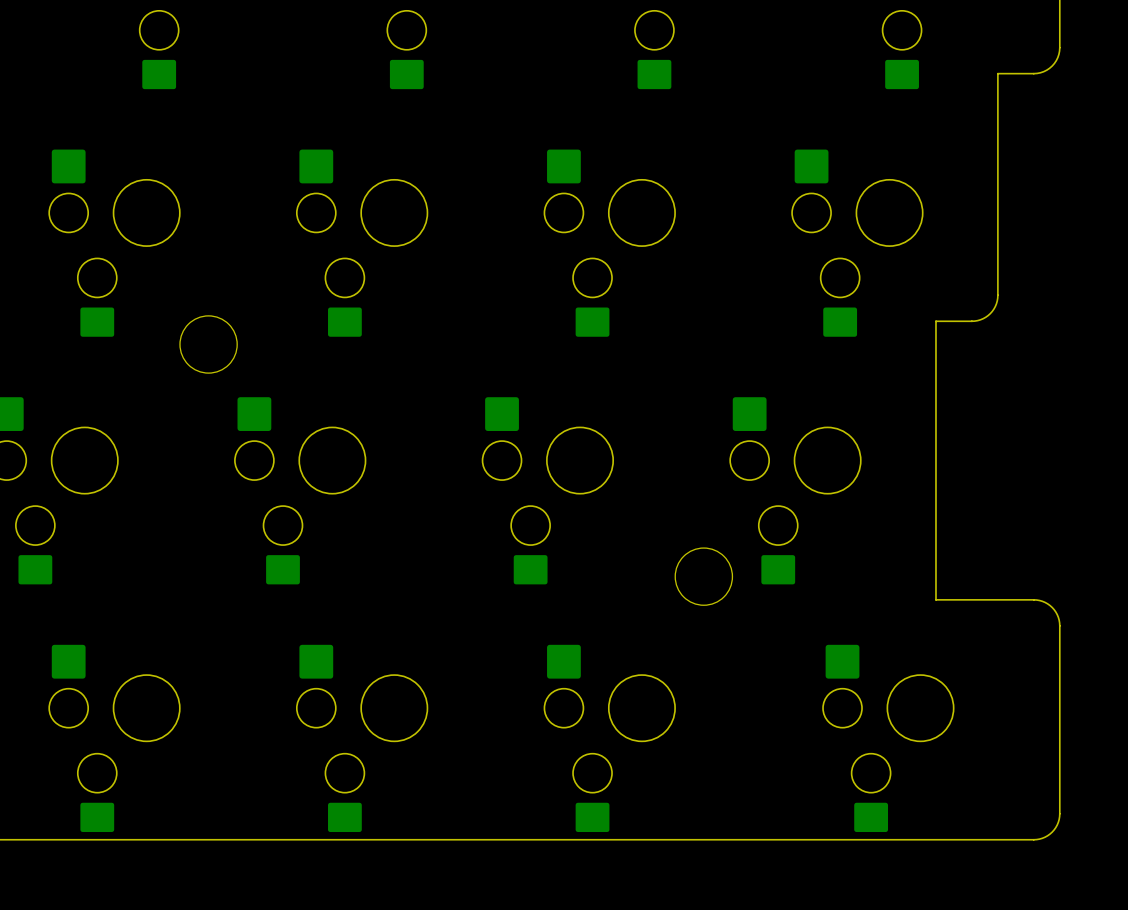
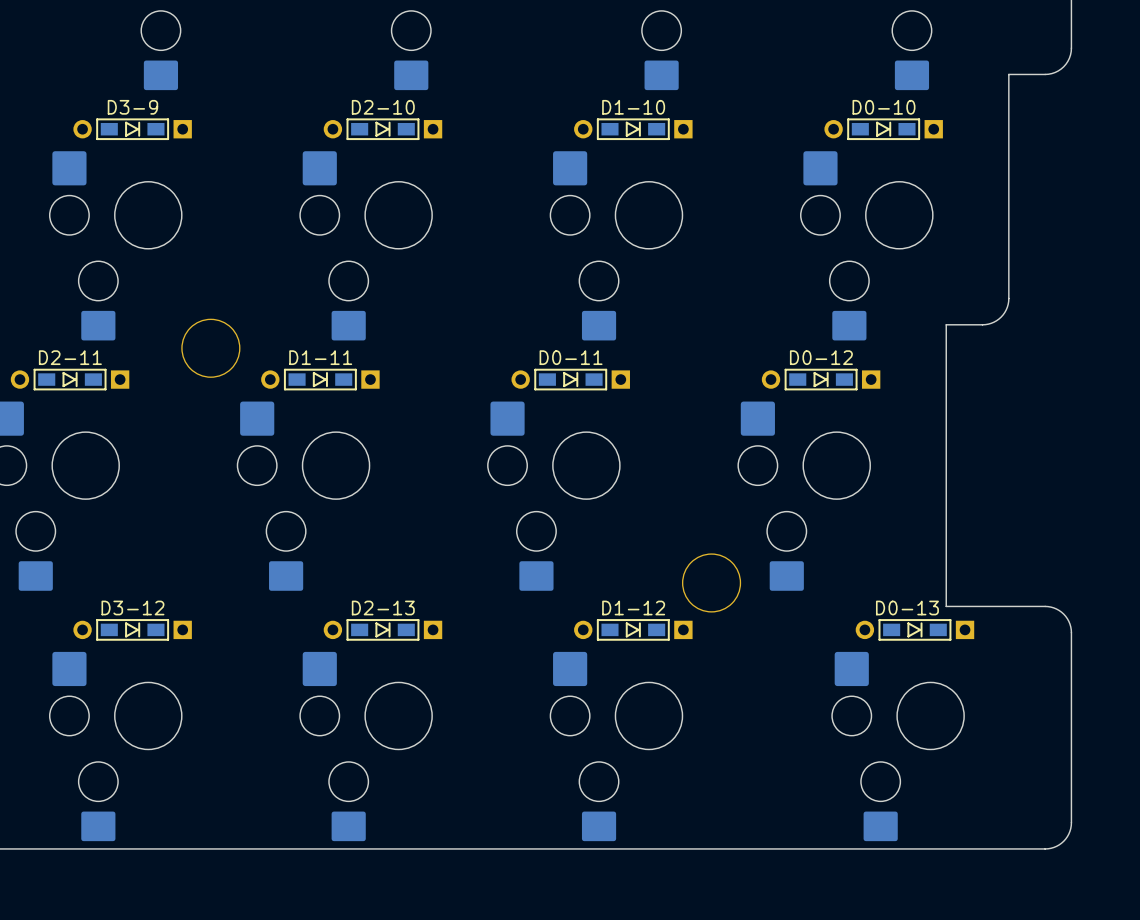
D3-9: none -> (132, 129)
D2-10: none -> (382, 129)
D1-10: none -> (633, 129)
D0-10: none -> (883, 129)
D2-11: none -> (70, 379)
D1-11: none -> (320, 379)
D0-11: none -> (570, 379)
D0-12: none -> (821, 379)
D3-12: none -> (132, 629)
D2-13: none -> (382, 629)
D1-12: none -> (633, 629)
D0-13: none -> (914, 629)

